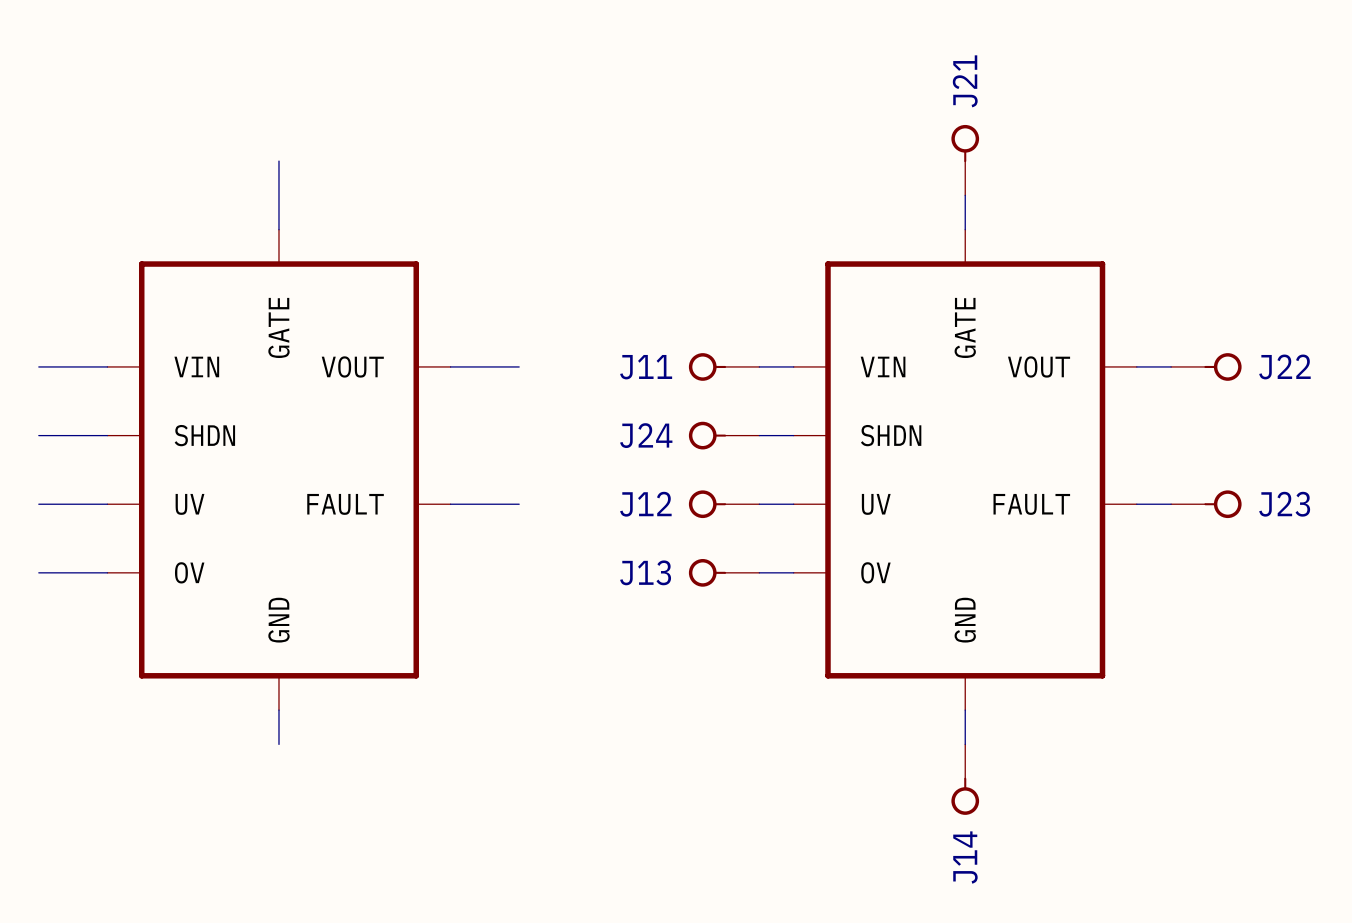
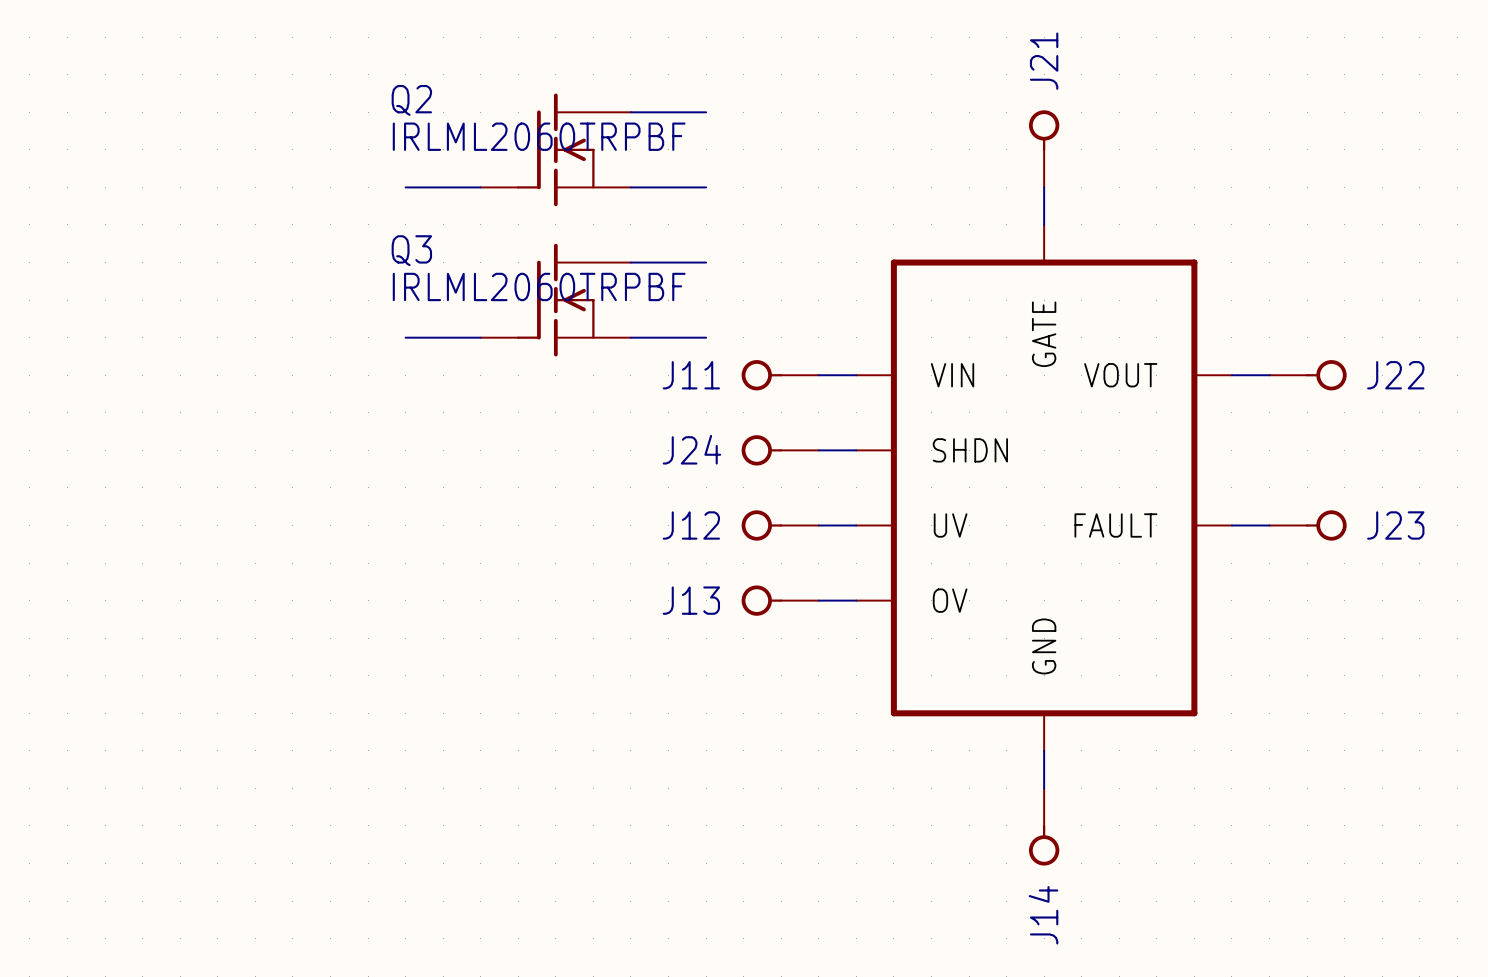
wire: none -> (630, 112) (706, 112)
wire: (278, 161) (278, 229) -> none
Q2: none -> IRLML2060TRPBF (555, 149)
wire: none -> (630, 187) (706, 187)
wire: none -> (630, 262) (706, 262)
Q3: none -> IRLML2060TRPBF (555, 300)
wire: none -> (630, 337) (706, 337)
wire: (38, 366) (107, 366) -> none
wire: (450, 366) (519, 366) -> (405, 187) (480, 187)
wire: (38, 435) (107, 435) -> none
part: (278, 469) -> none
wire: (38, 504) (107, 504) -> none
wire: (450, 504) (519, 504) -> (405, 337) (480, 337)
wire: (38, 572) (107, 572) -> none
wire: (278, 710) (278, 744) -> none

